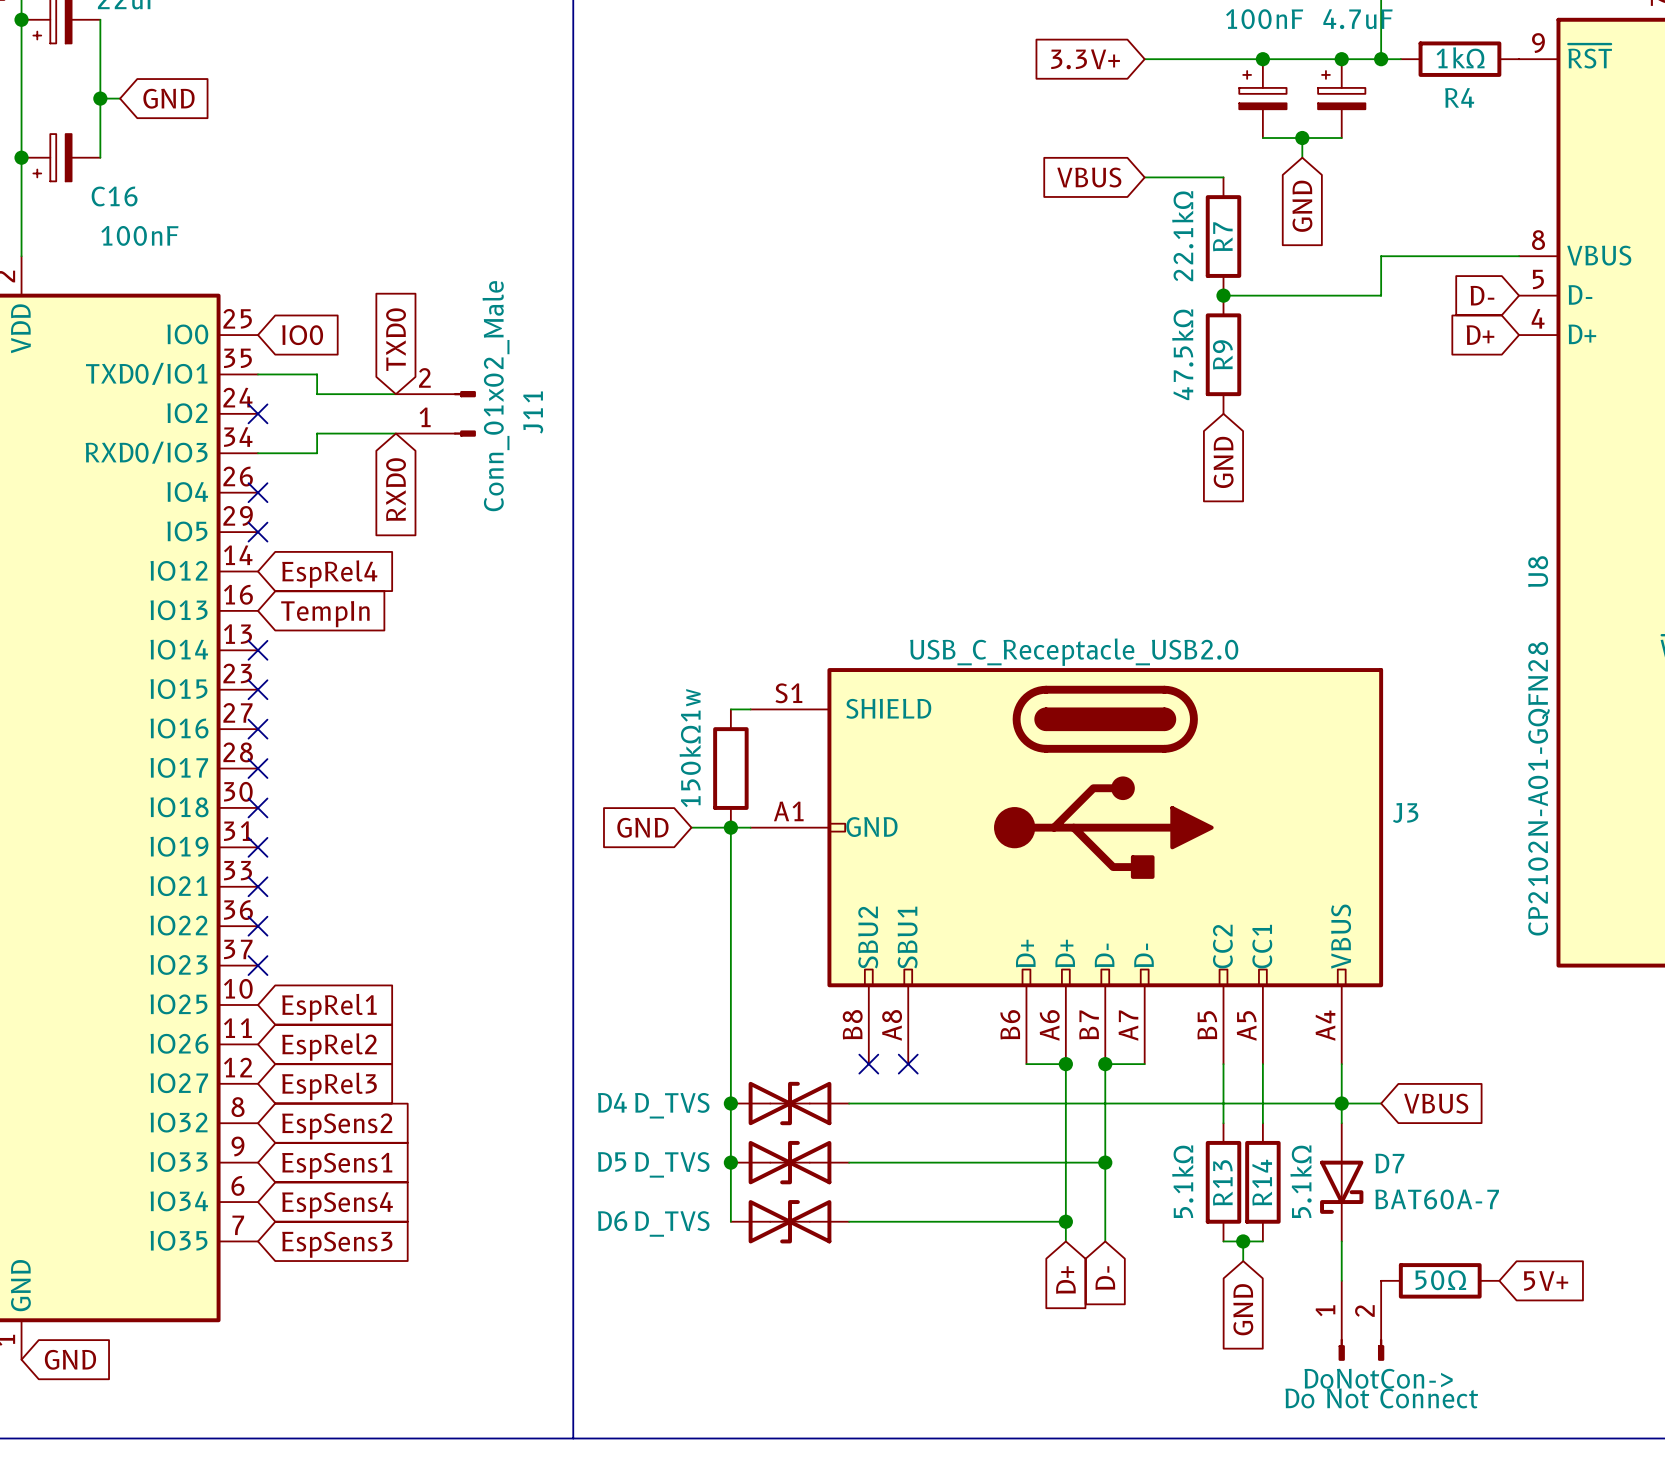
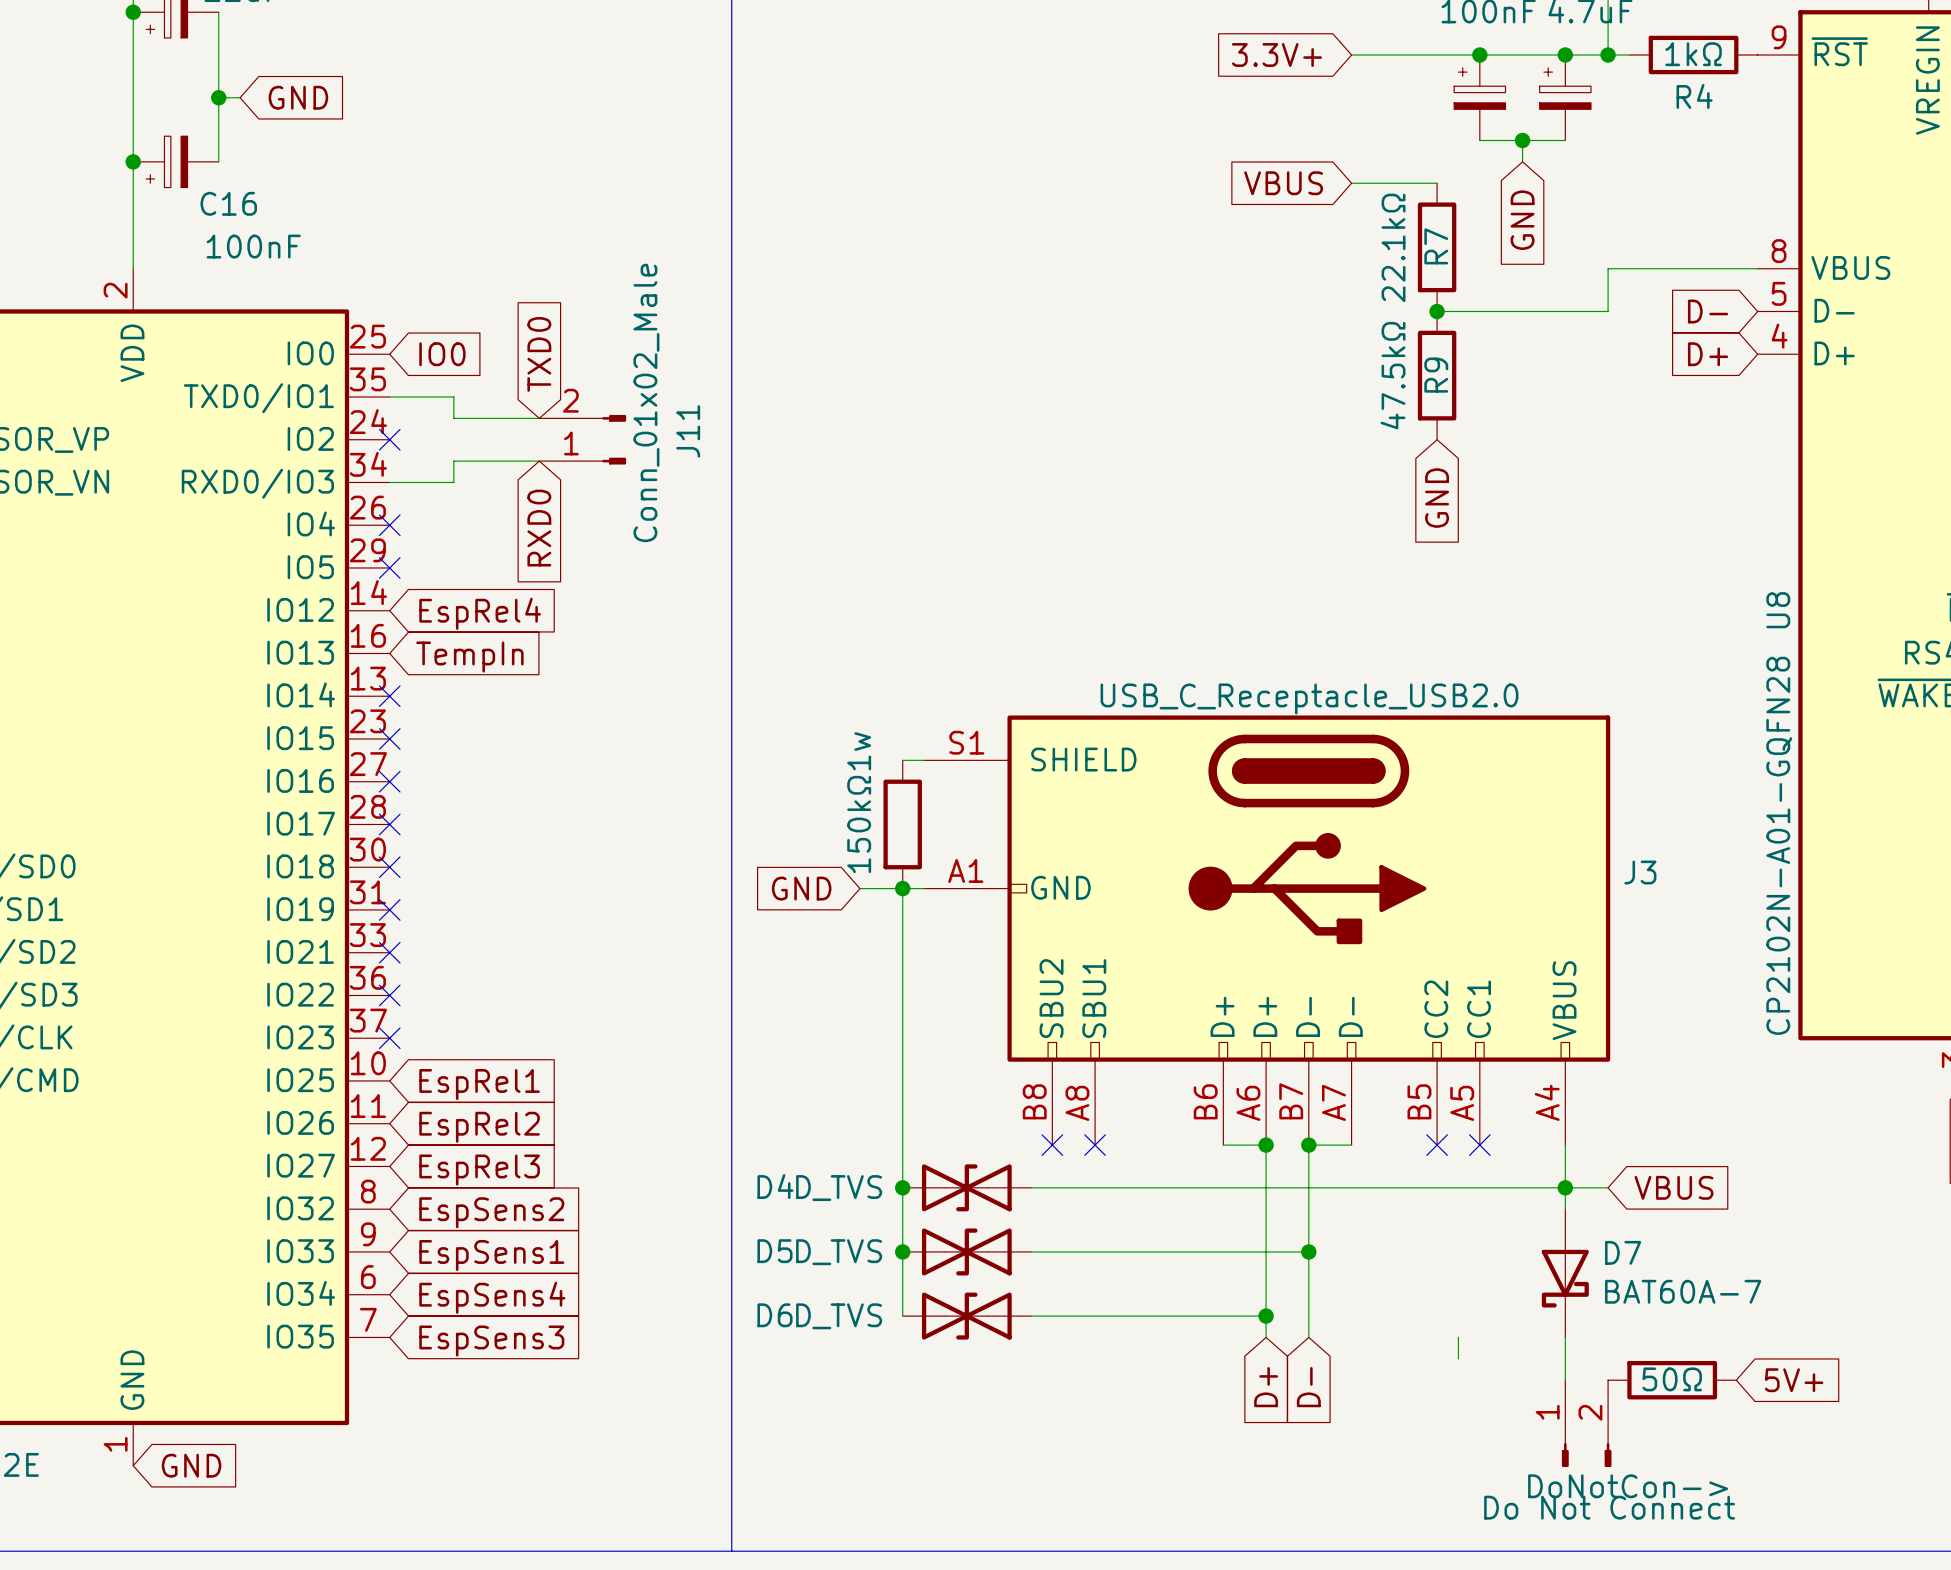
wire: (1223, 1064) (1223, 1123) -> none
no-connect mark: none -> (1437, 1145)
wire: (1262, 1064) (1262, 1123) -> none
no-connect mark: none -> (1479, 1145)
R13: 5.1kΩ (1223, 1182) -> none
R14: 5.1kΩ (1262, 1182) -> none
wire: (1223, 1241) (1262, 1241) -> none
junction: (1243, 1241) -> none
global label: GND (1243, 1309) -> none

